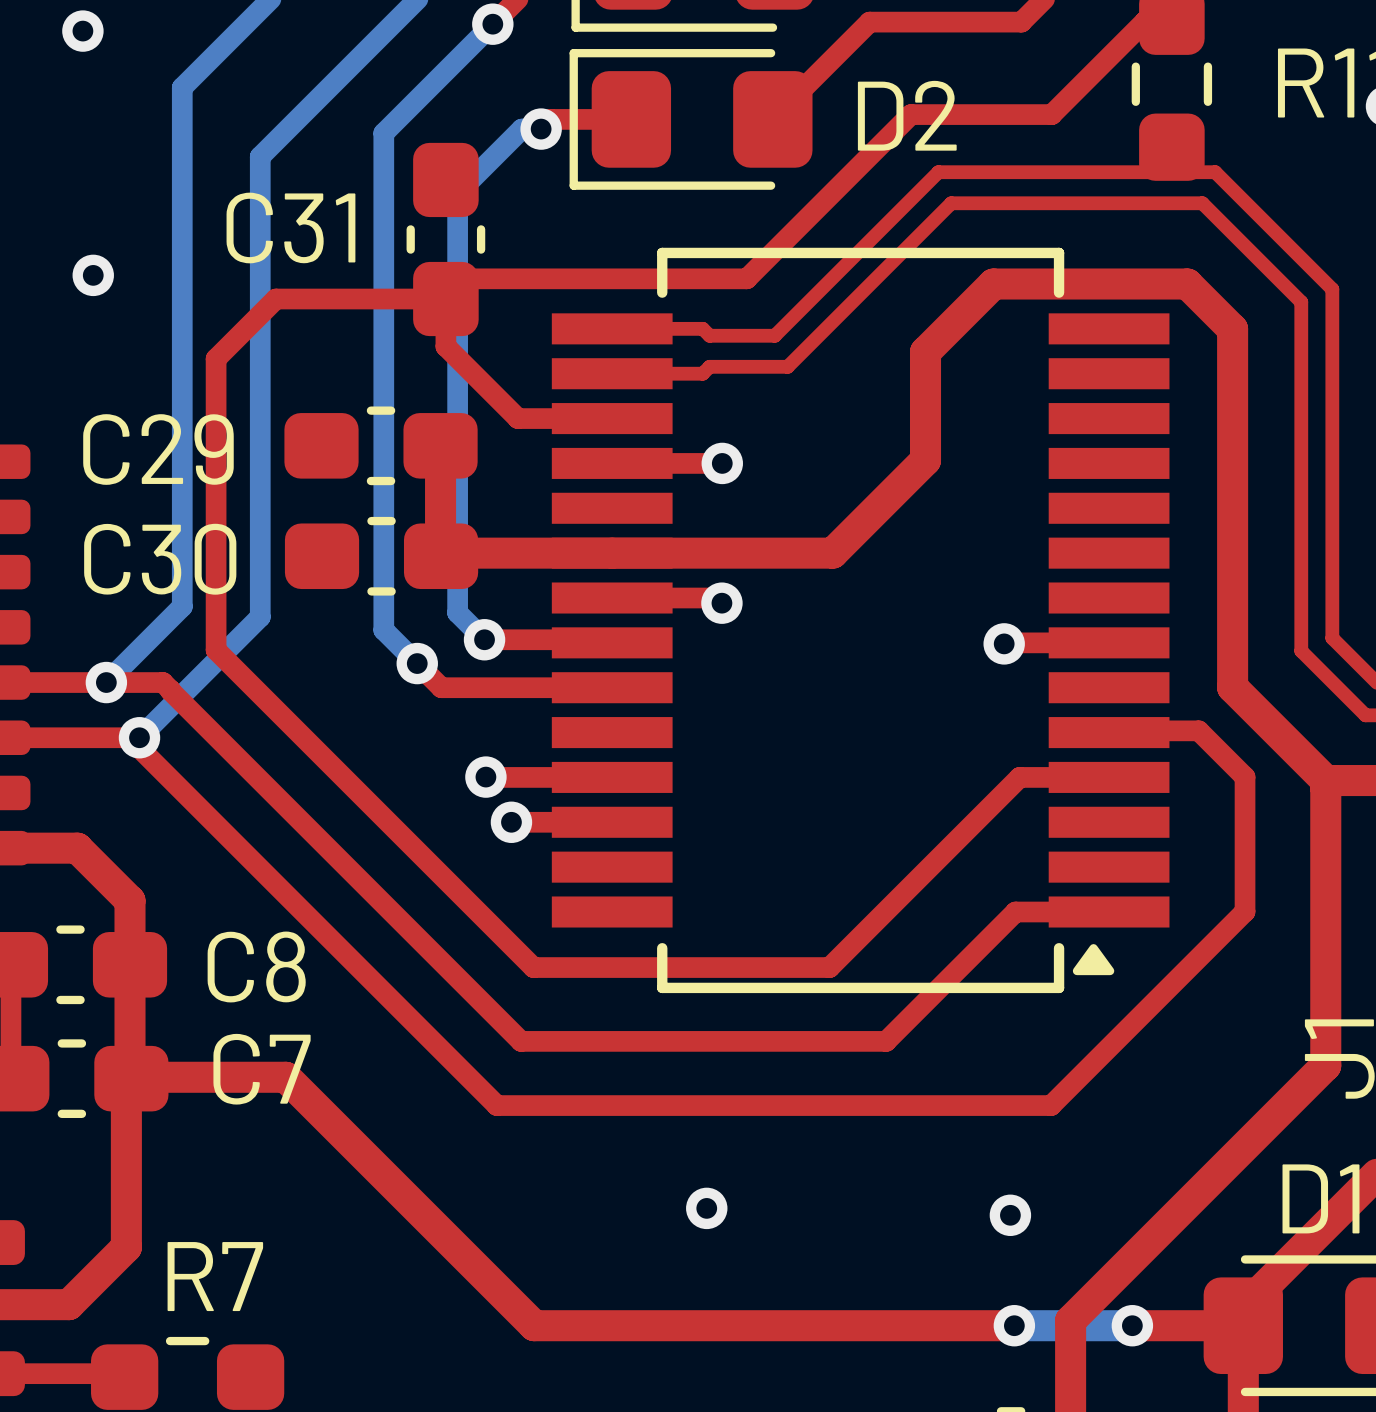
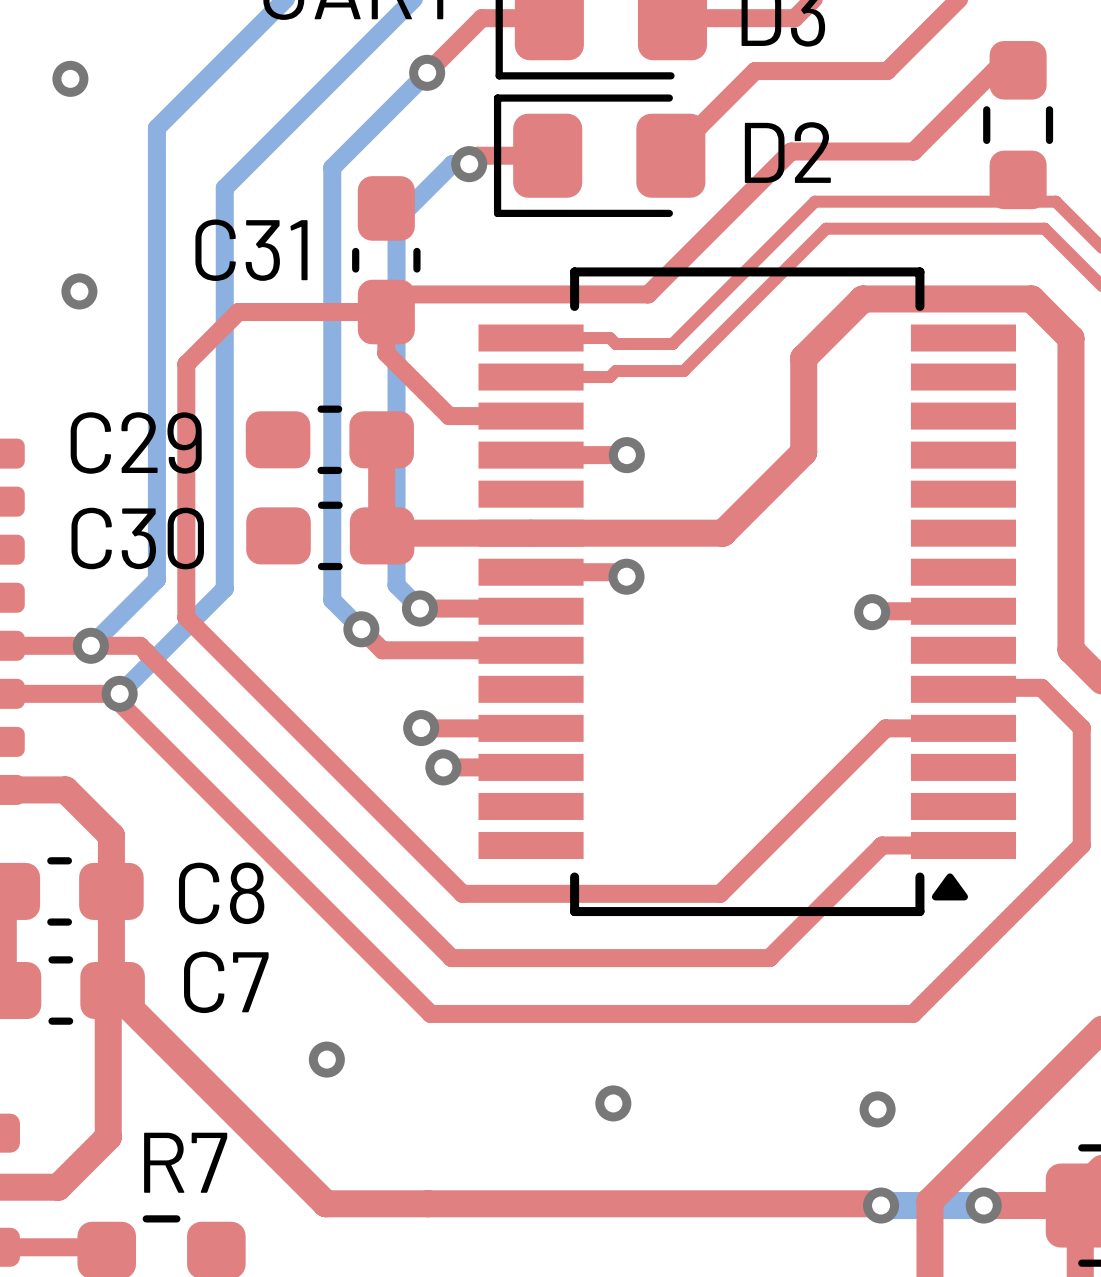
top track: (130, 1077) (285, 1077) (534, 1325) (1014, 1325) -> (111, 989) (325, 1203) (879, 1203) (881, 1205)
via: none -> (326, 1059)

